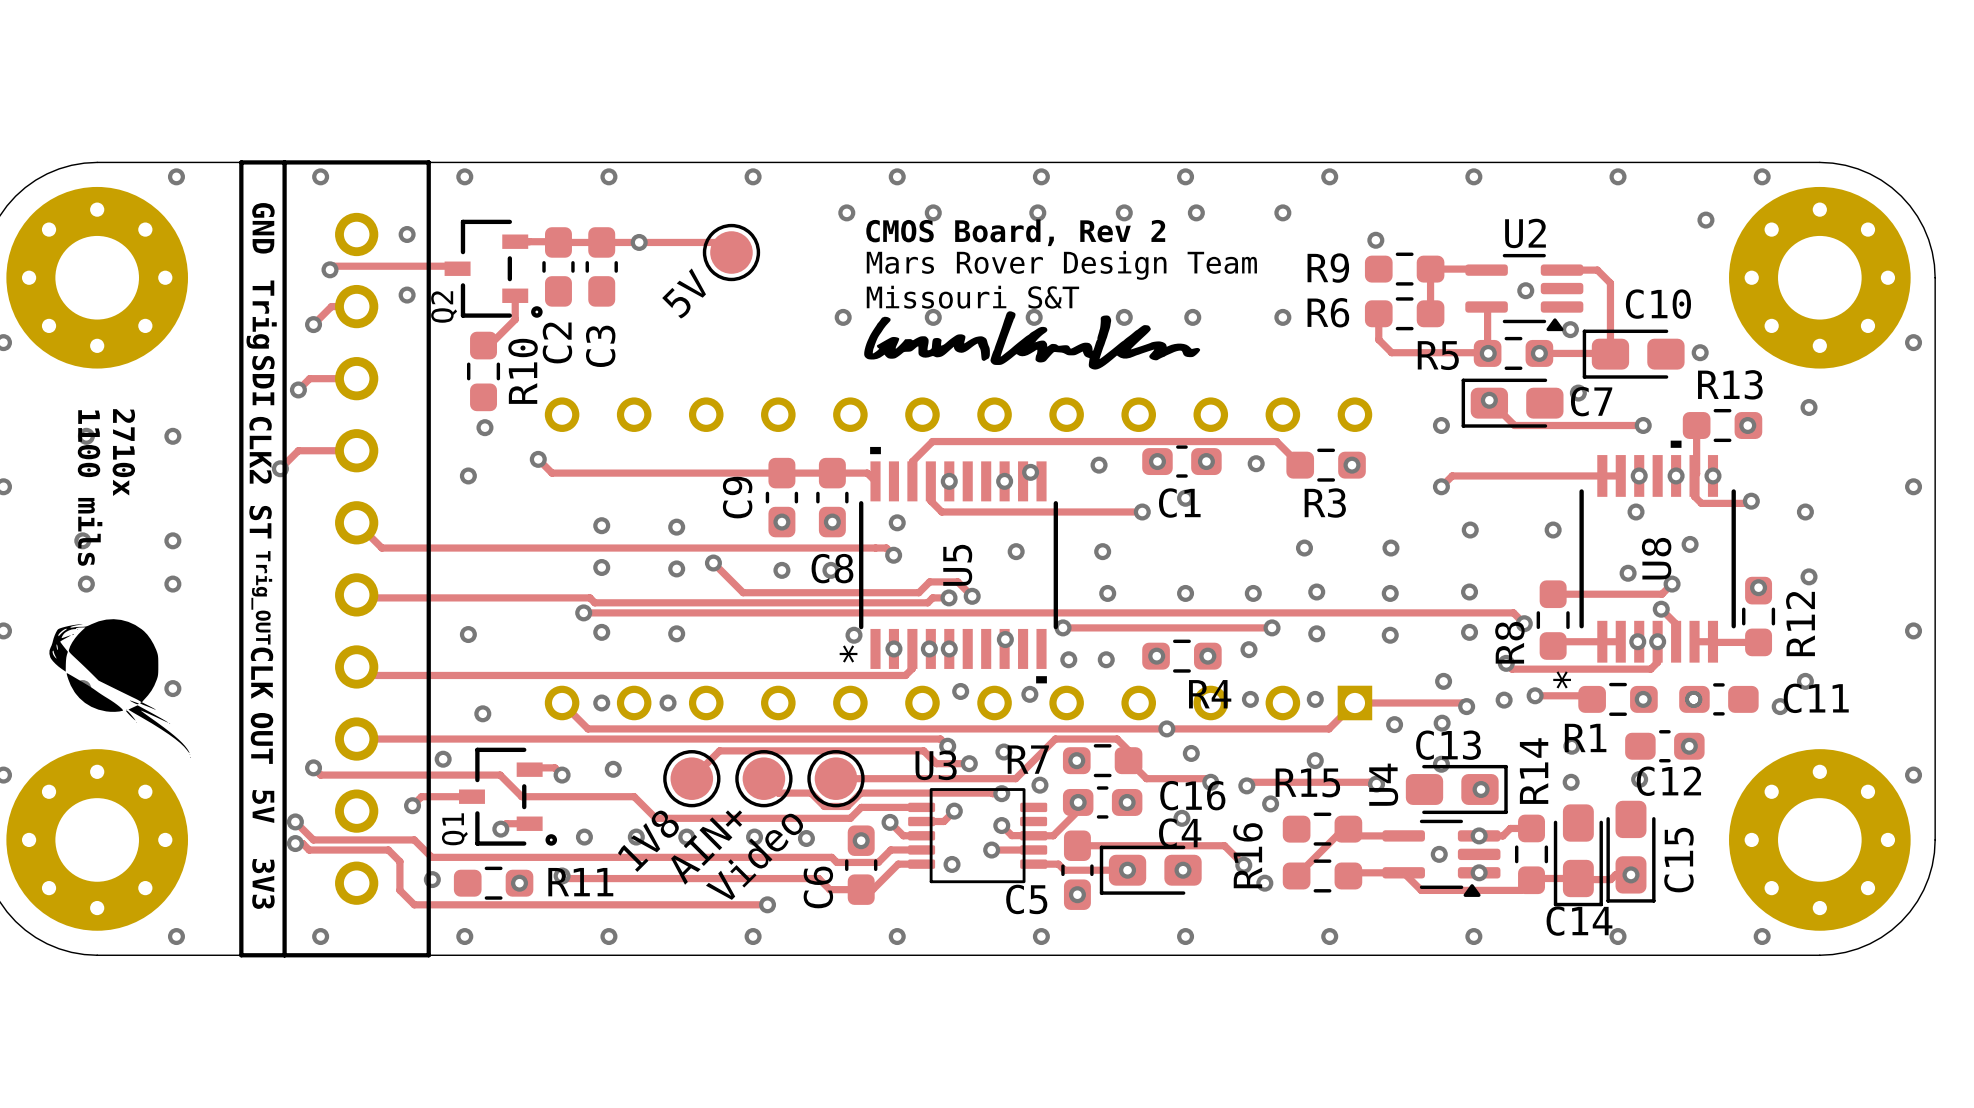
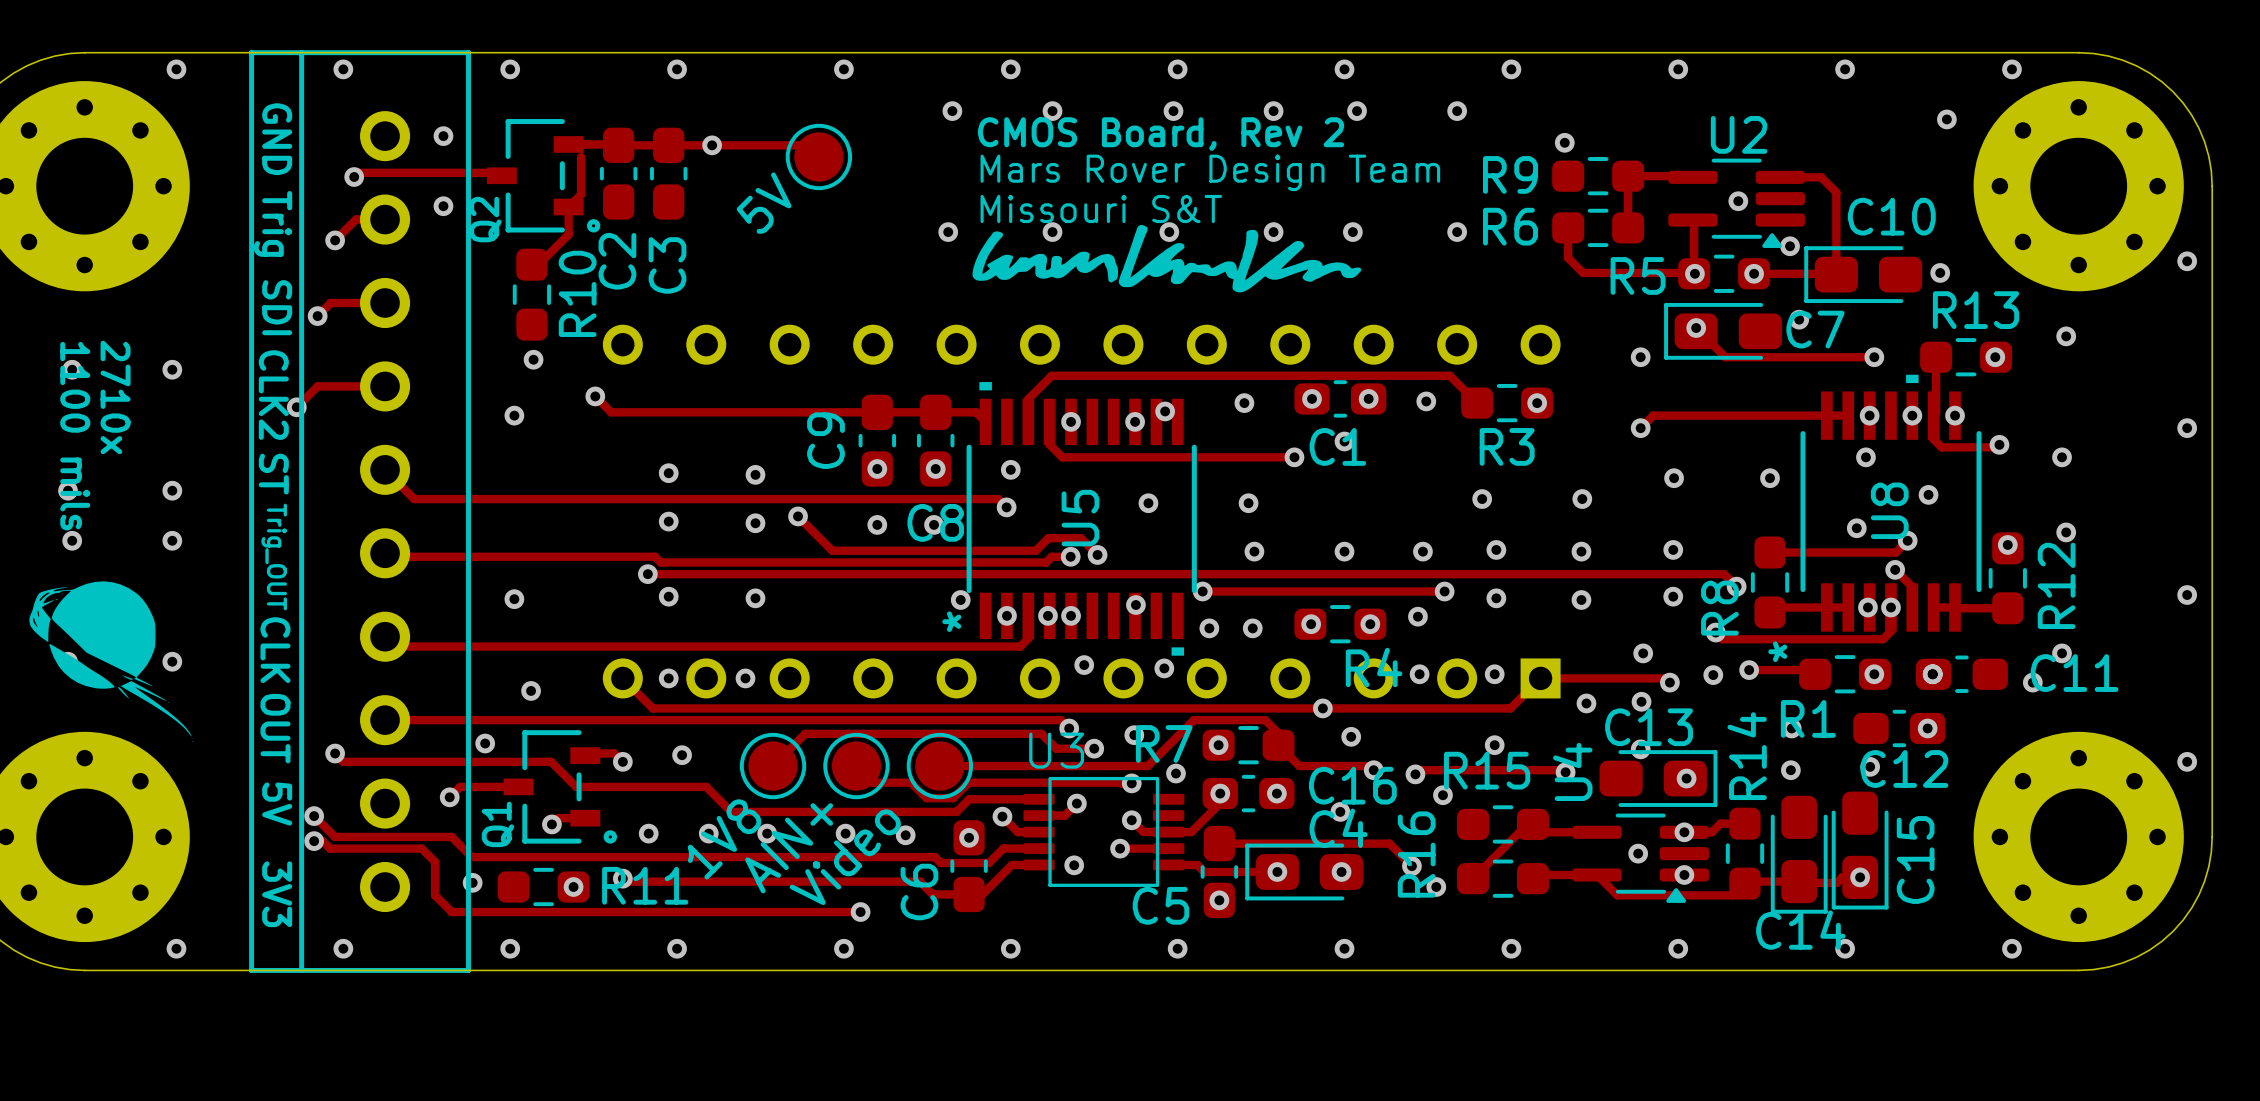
track: none -> (581, 156) (581, 194) (568, 207)

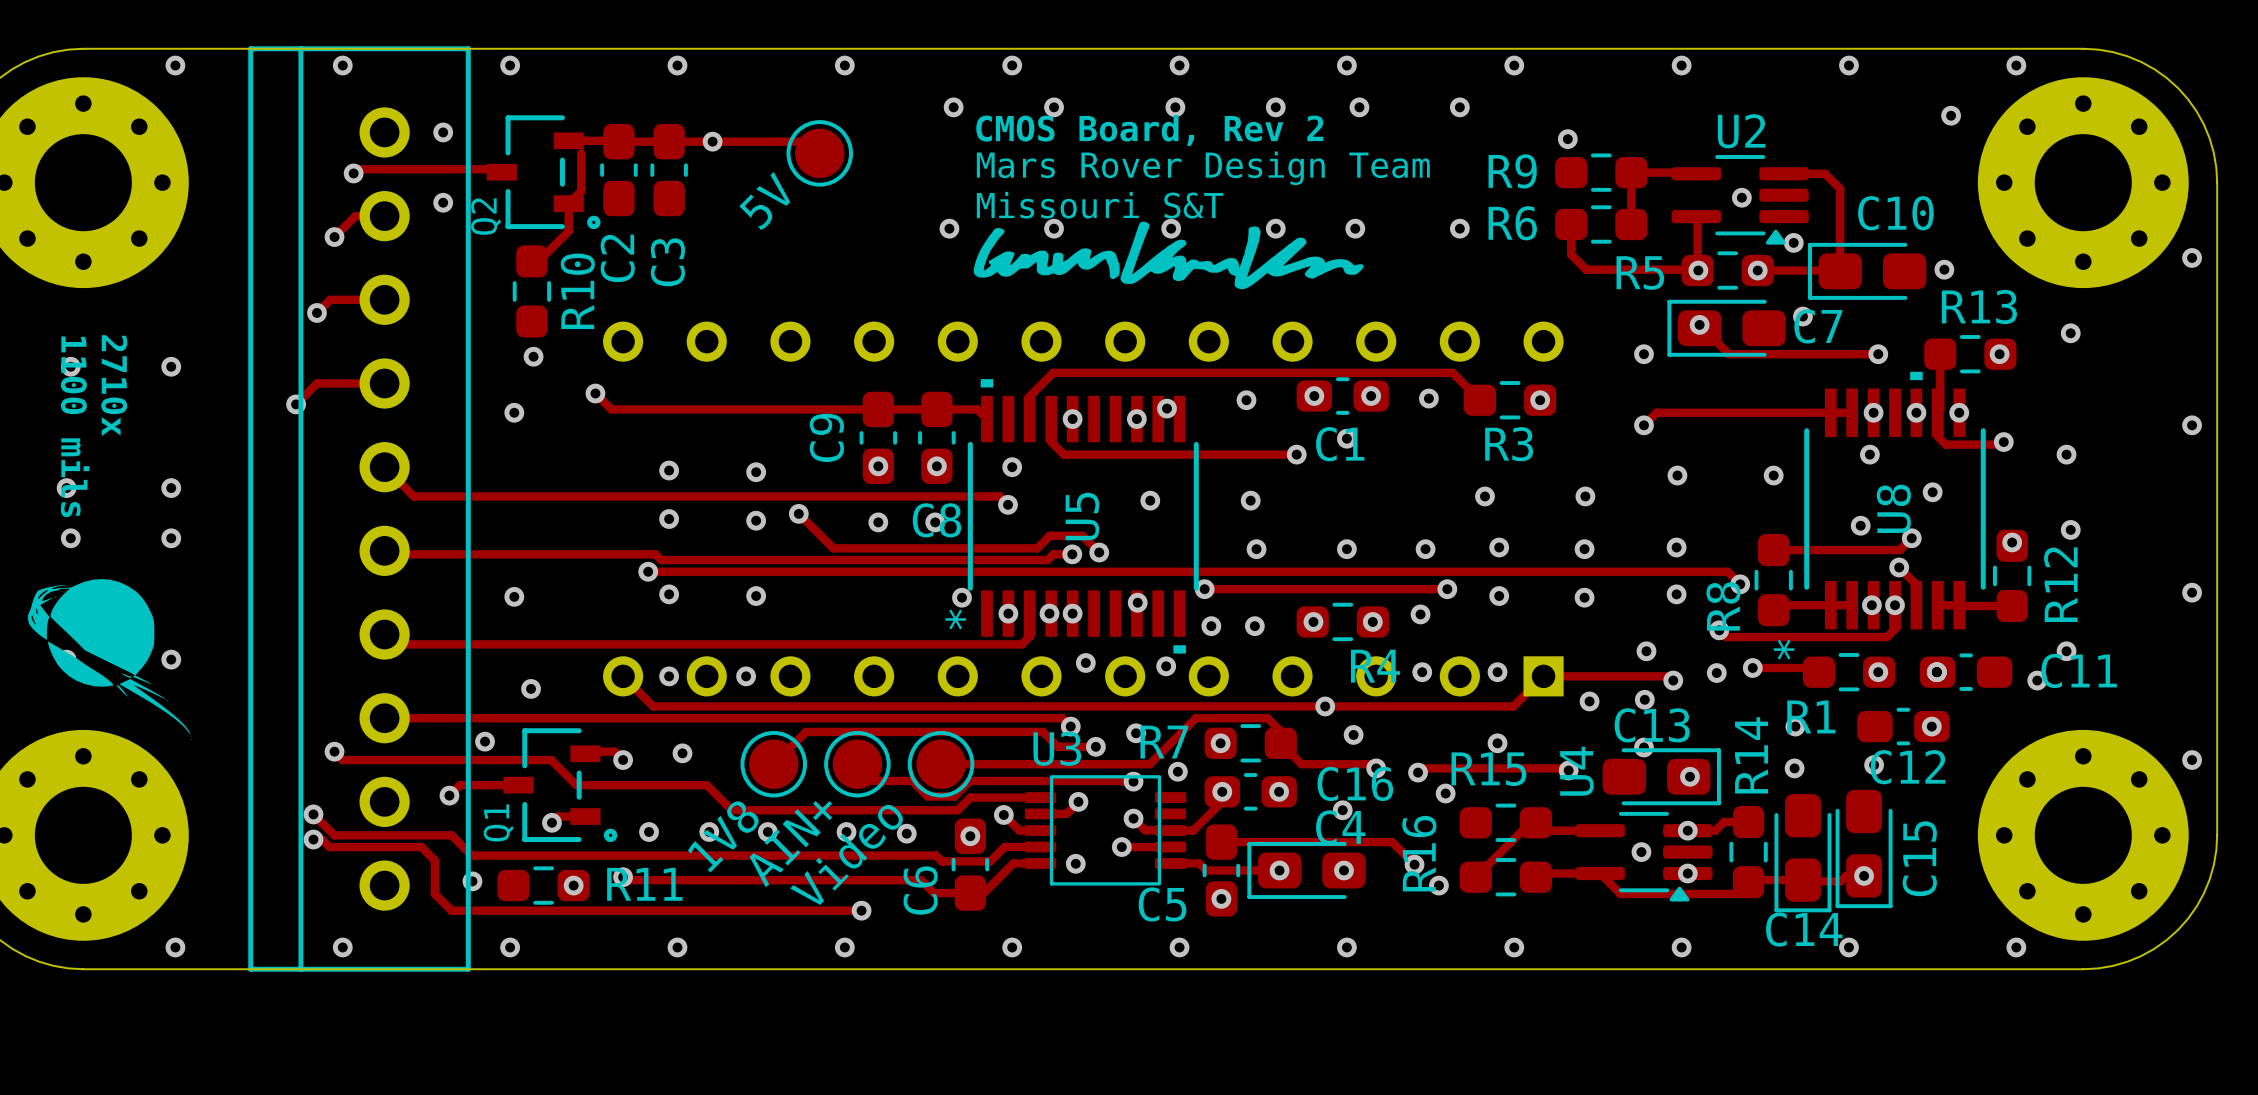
text: GND (277, 139) -> none
text: Trig (272, 223) -> none
text: SDI (277, 307) -> none
text: CLK2 (273, 395) -> none
text: ST (273, 474) -> none
text: Trig_OUT (274, 556) -> none
text: CLK (275, 650) -> none
text: OUT (275, 728) -> none
text: 5V (277, 804) -> none
text: 3V3 (277, 894) -> none

